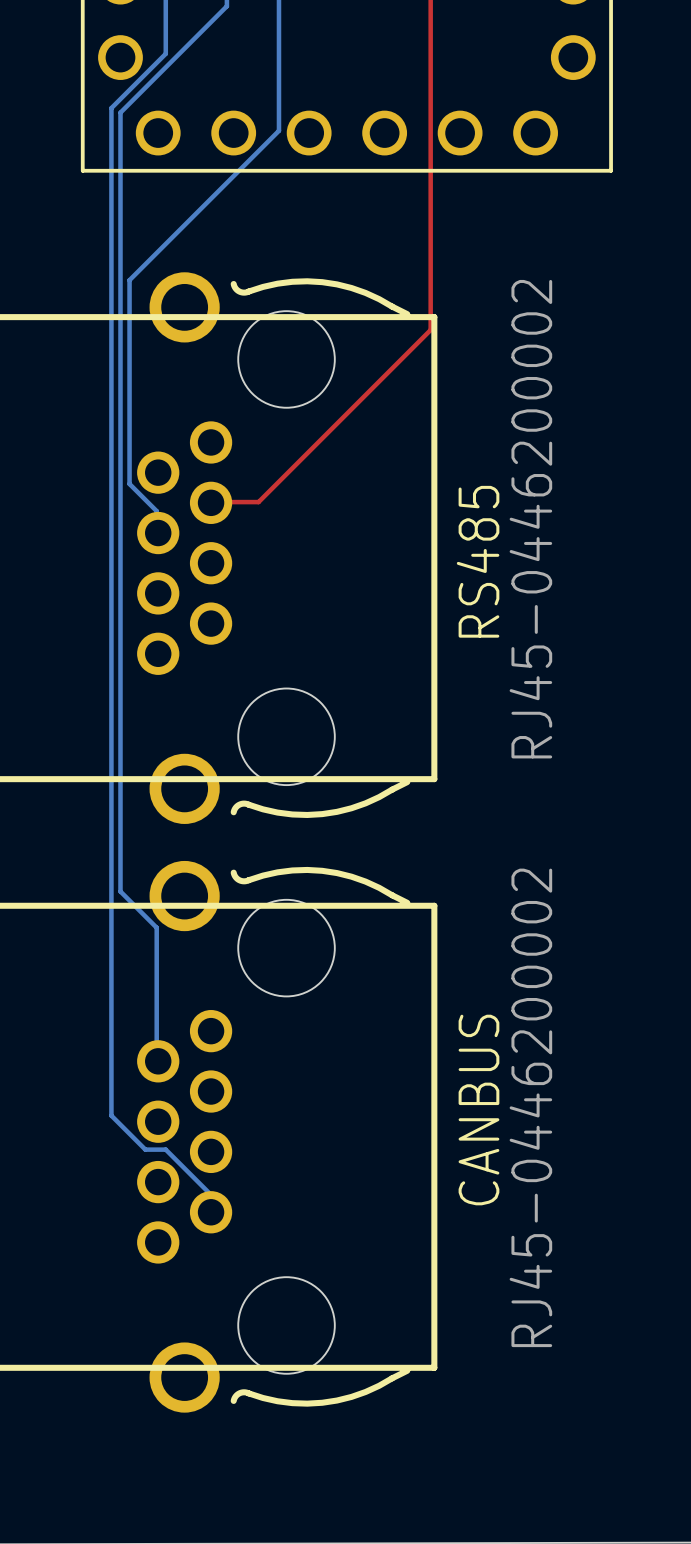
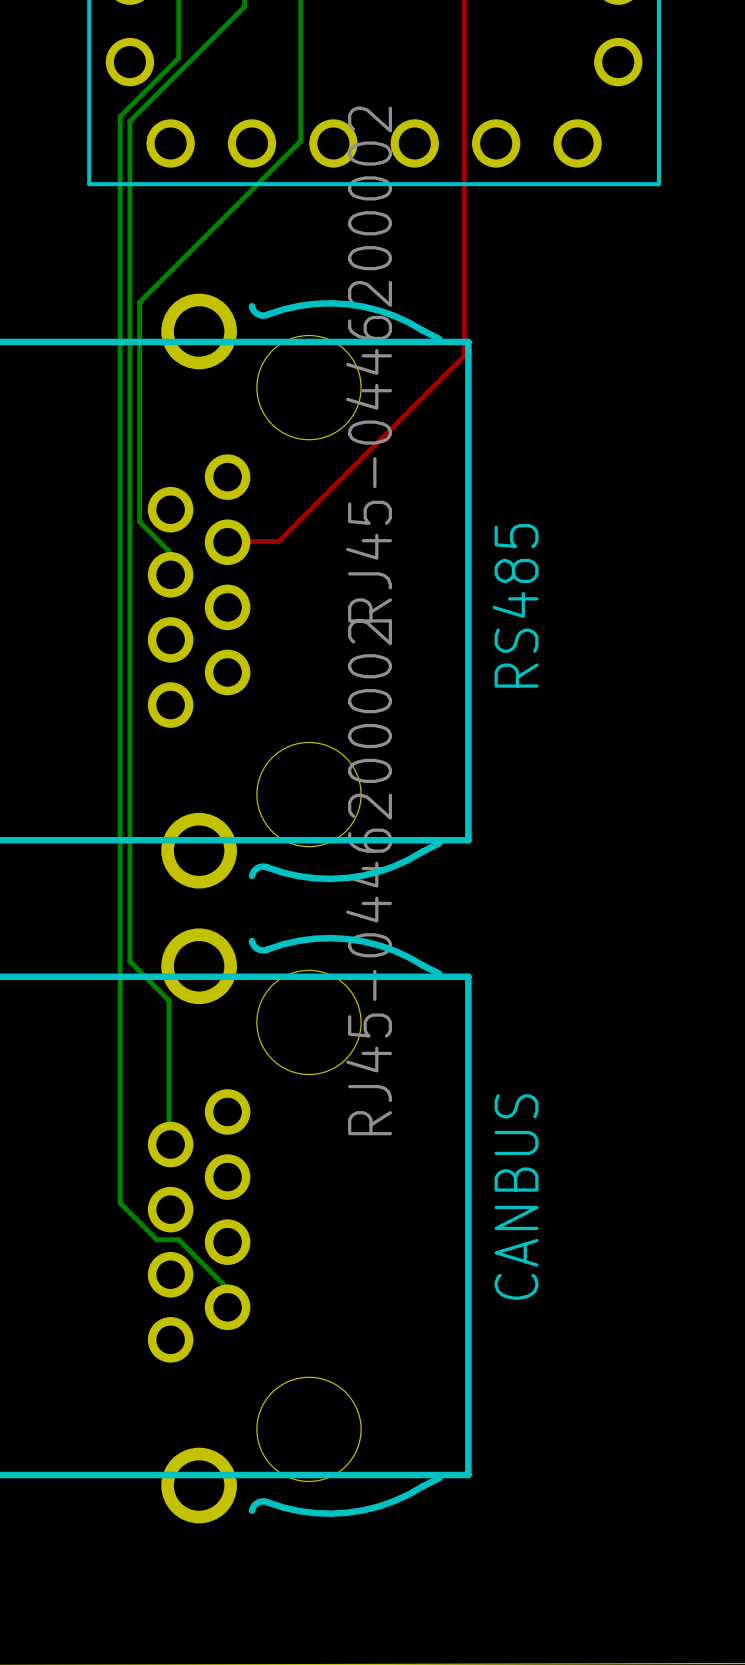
RS485 value position: RJ45-0446200002 (530, 519) -> RJ45-0446200002 (369, 364)
CANBUS value position: RJ45-0446200002 (530, 1107) -> RJ45-0446200002 (369, 877)

